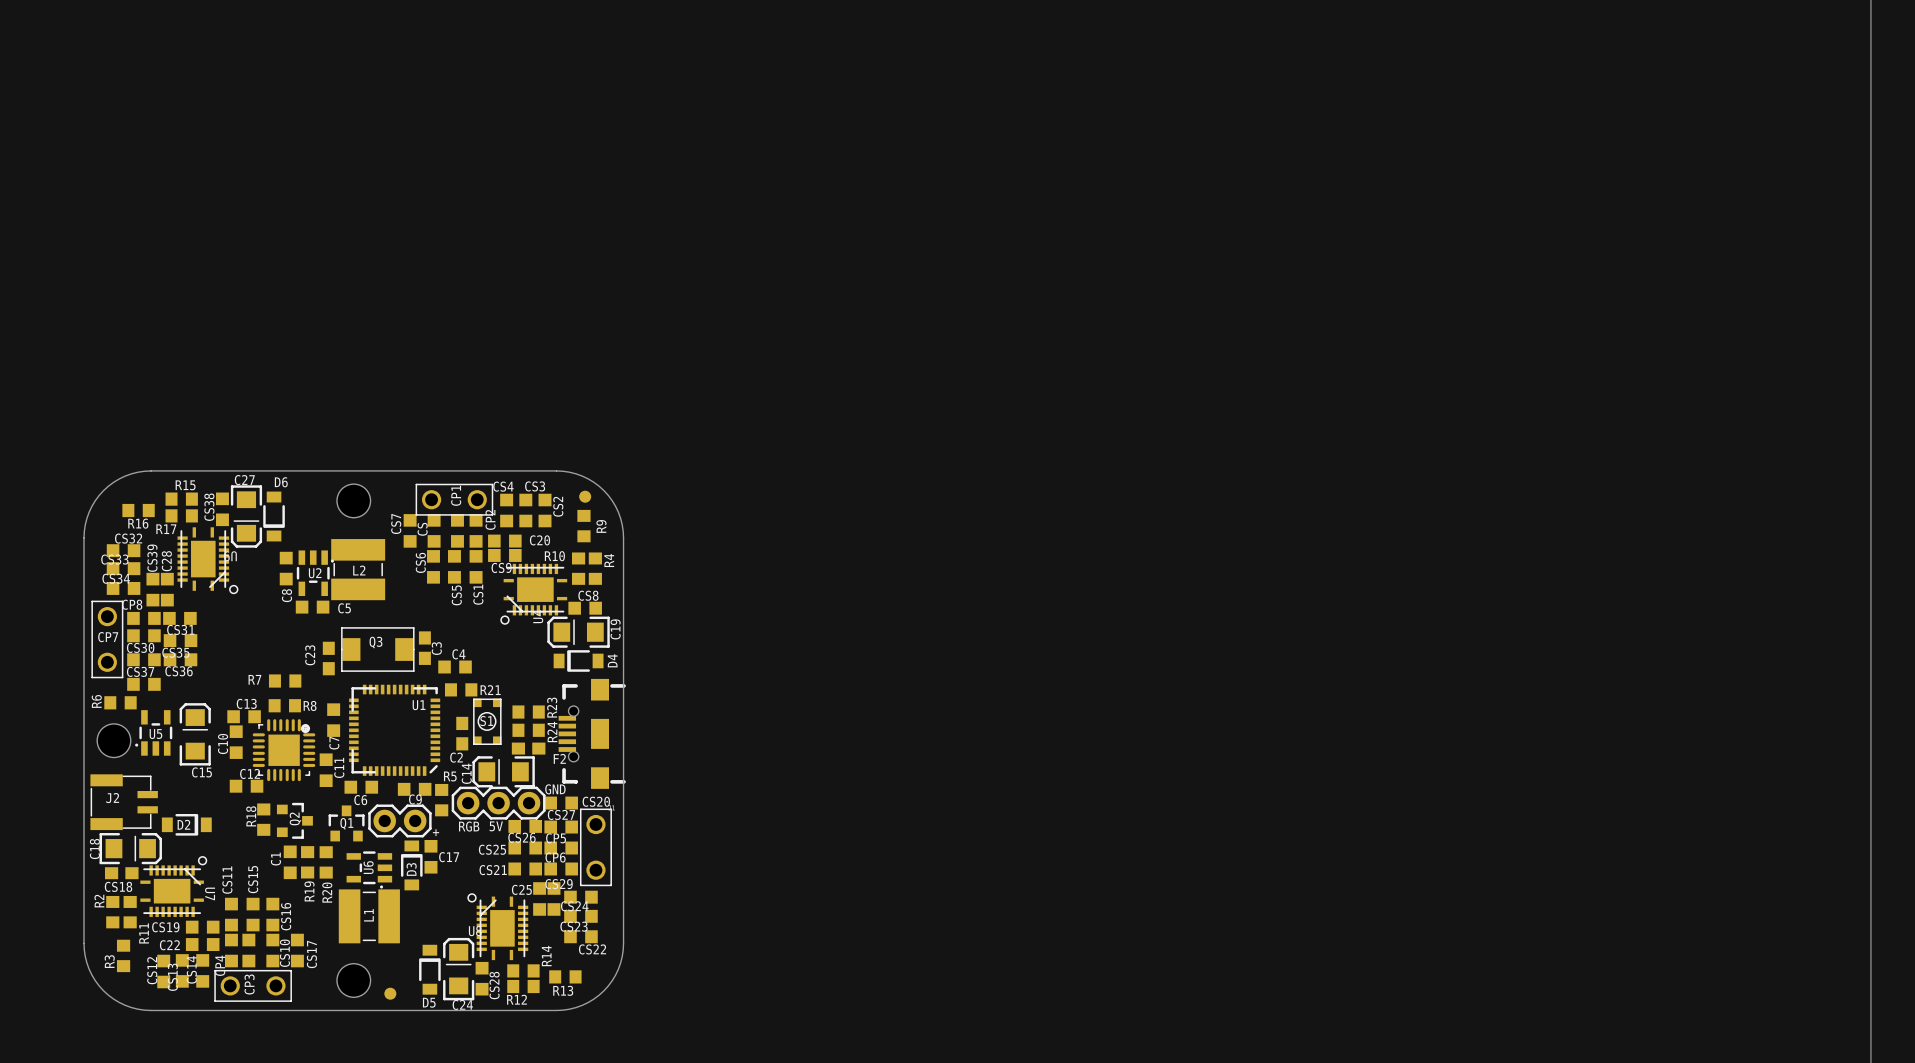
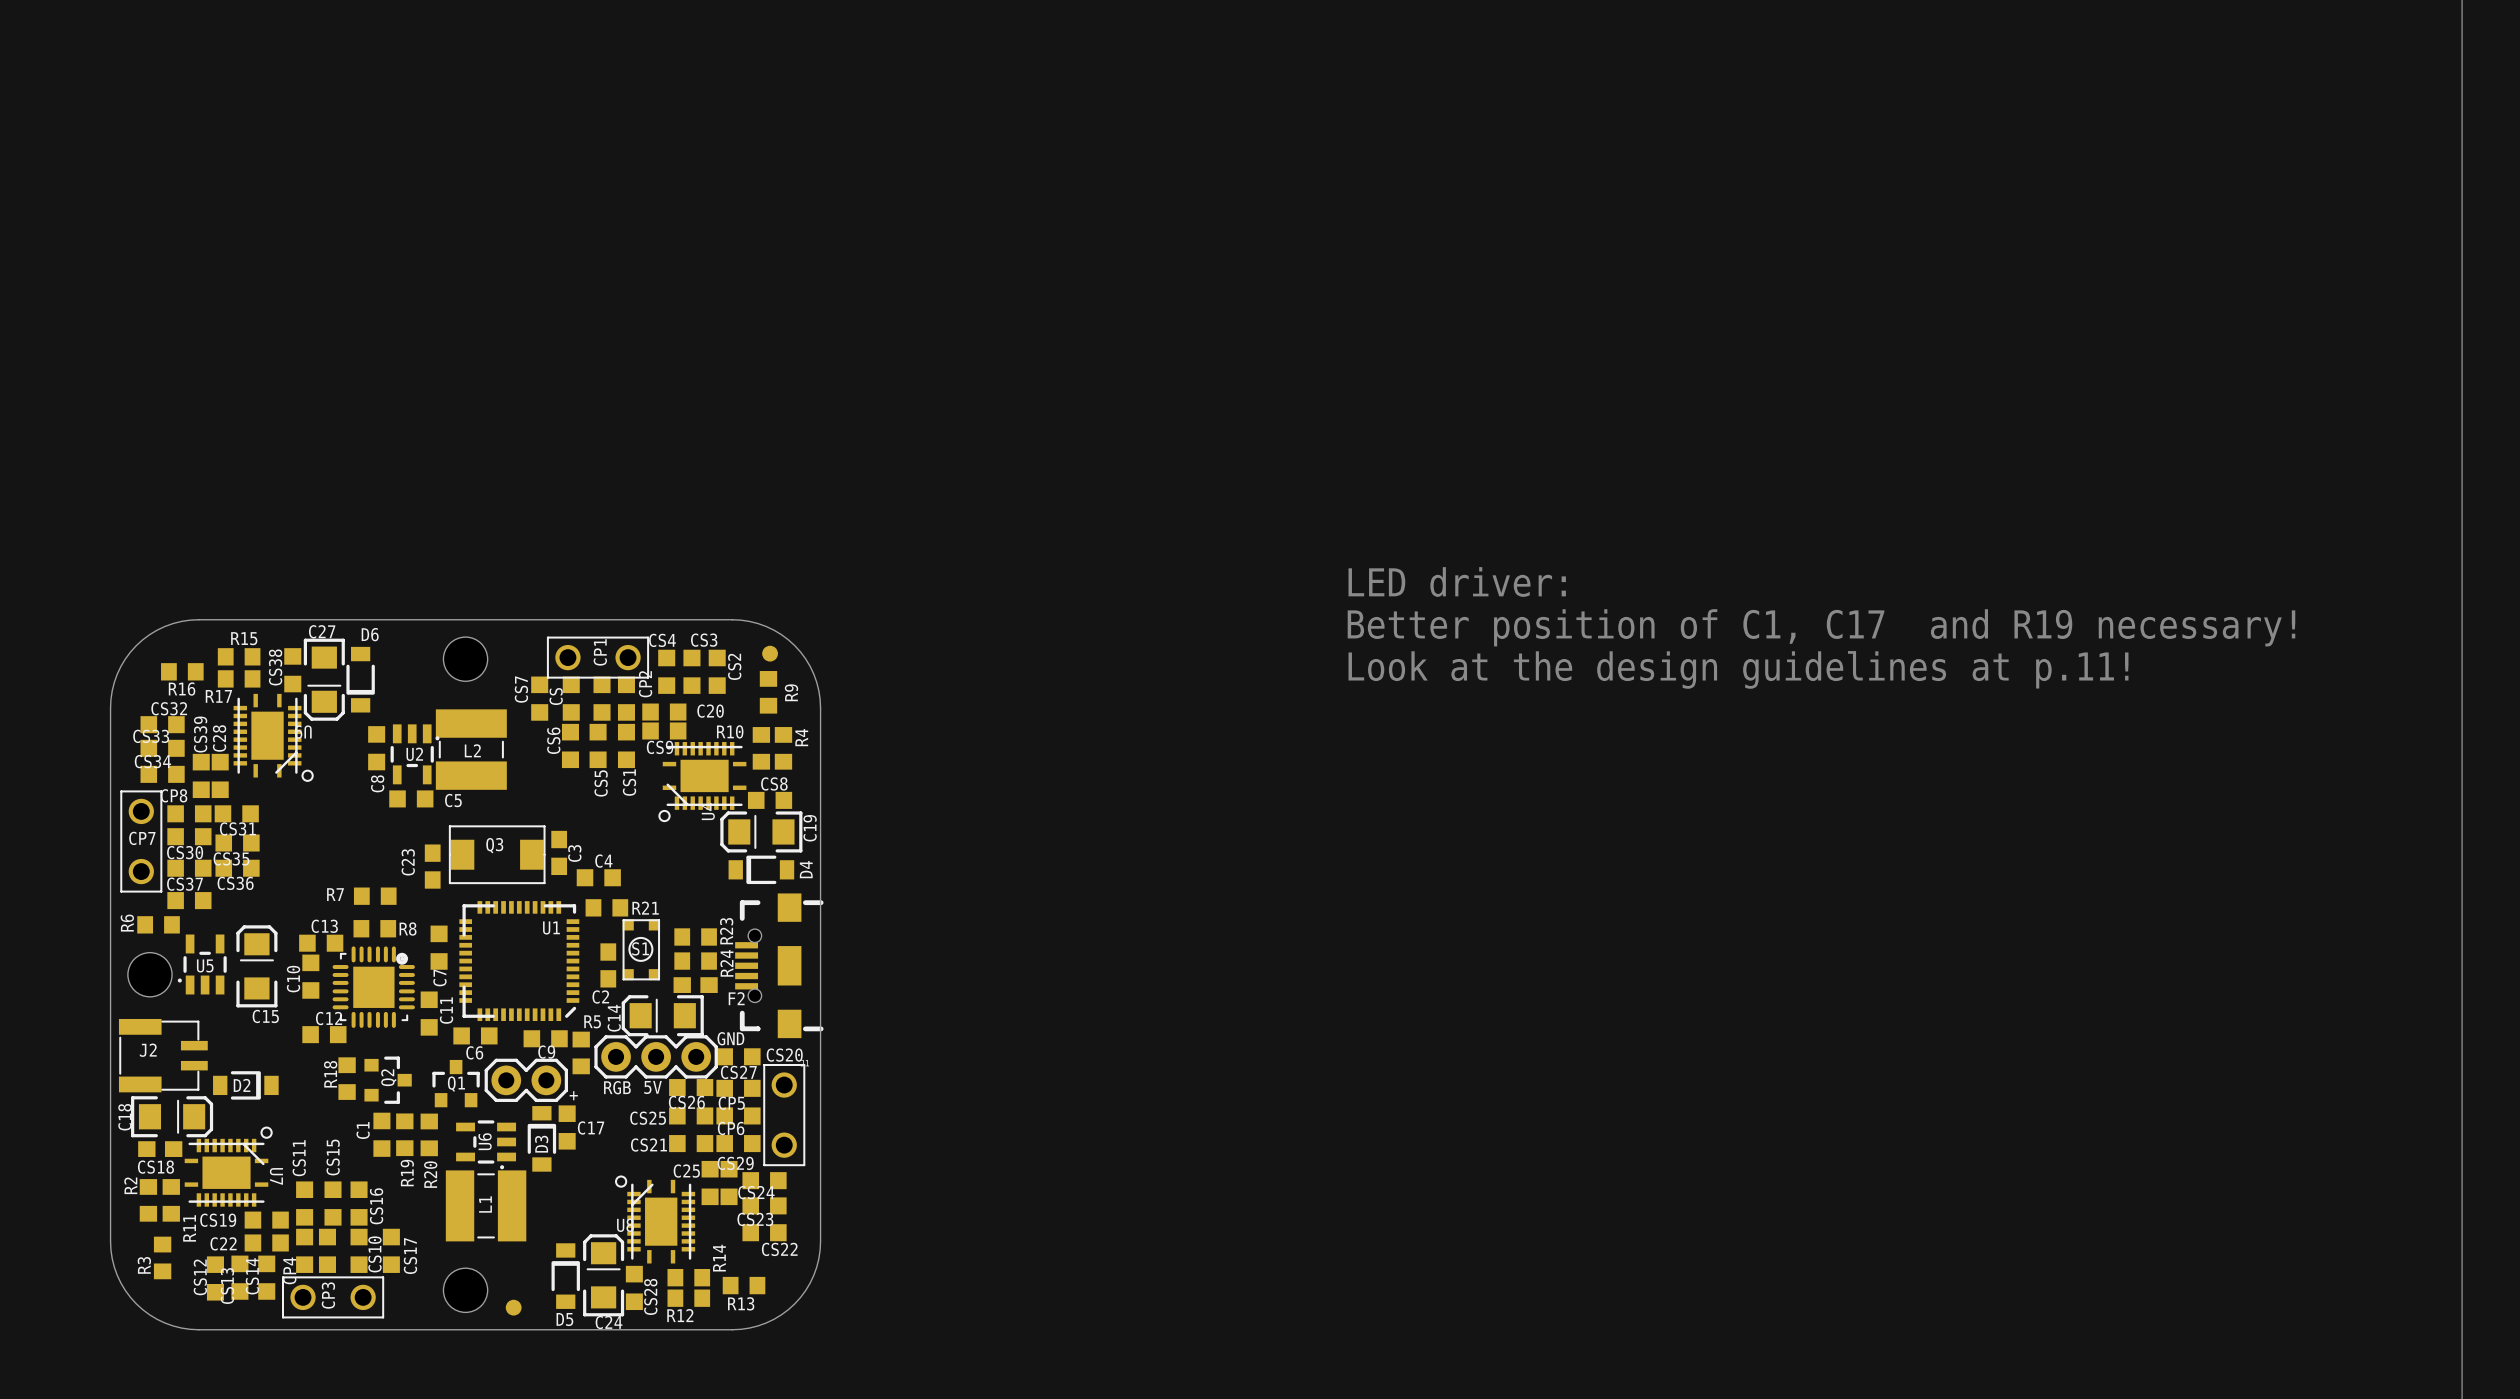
text: none -> LED driver: (1457, 582)
text: none -> Better position of C1, C17 and R19 necessary! (1821, 627)
text: none -> Look at the design guidelines at p.11! (1738, 669)

